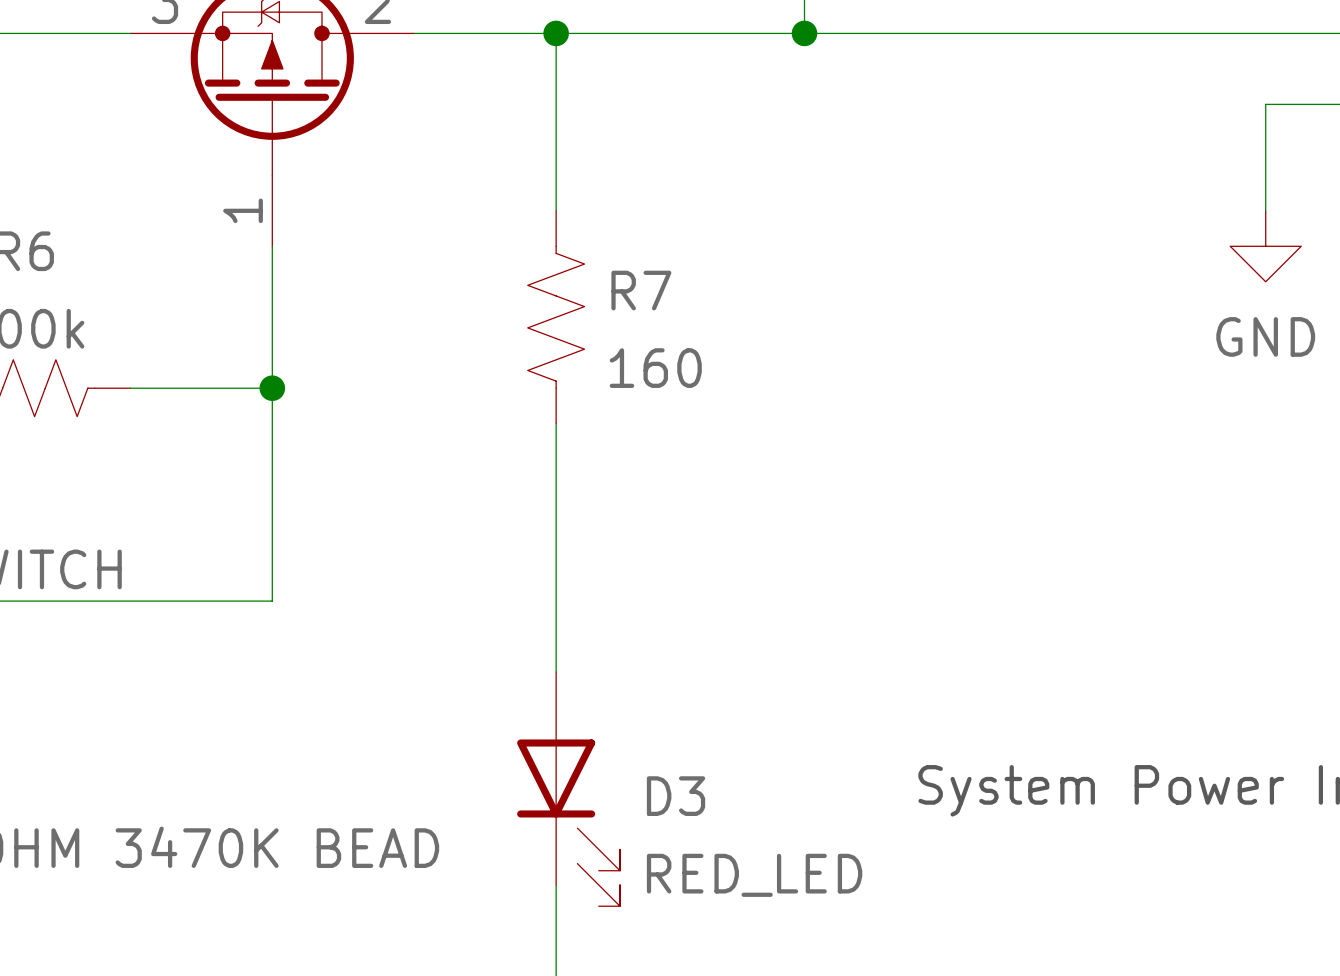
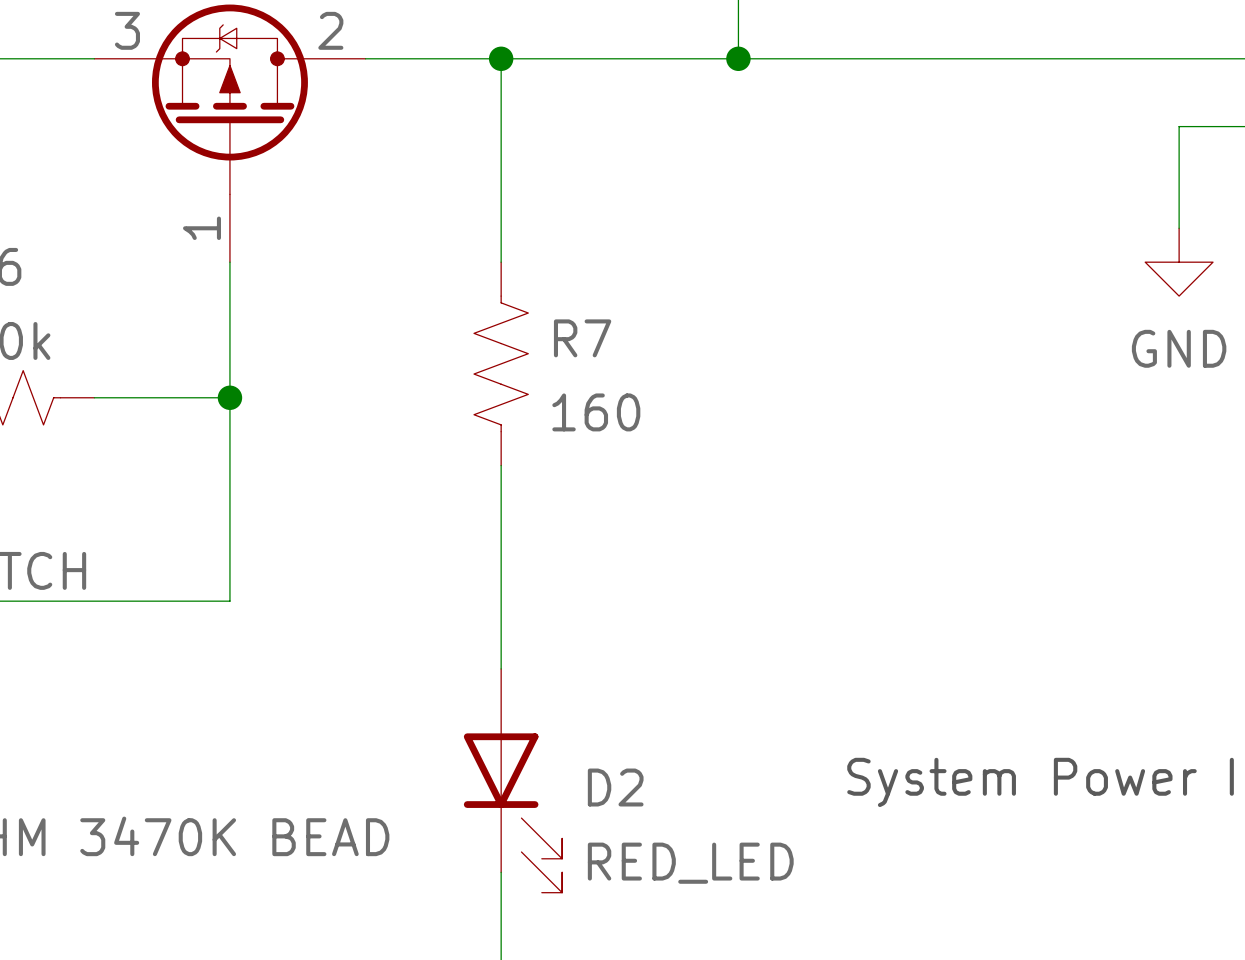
R7 position: (556, 317) -> (501, 363)
D3 name: D3 (676, 796) -> D2 (615, 787)

